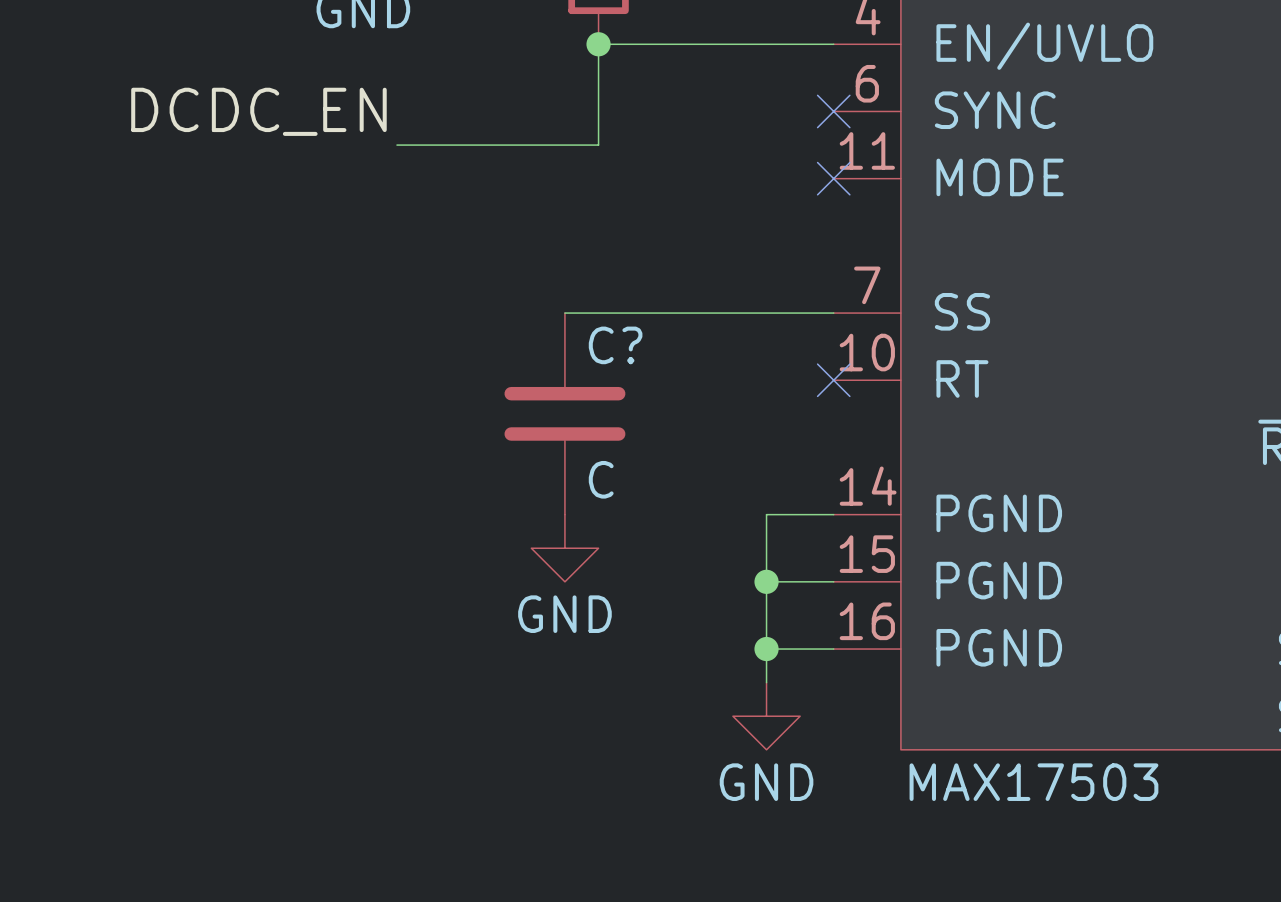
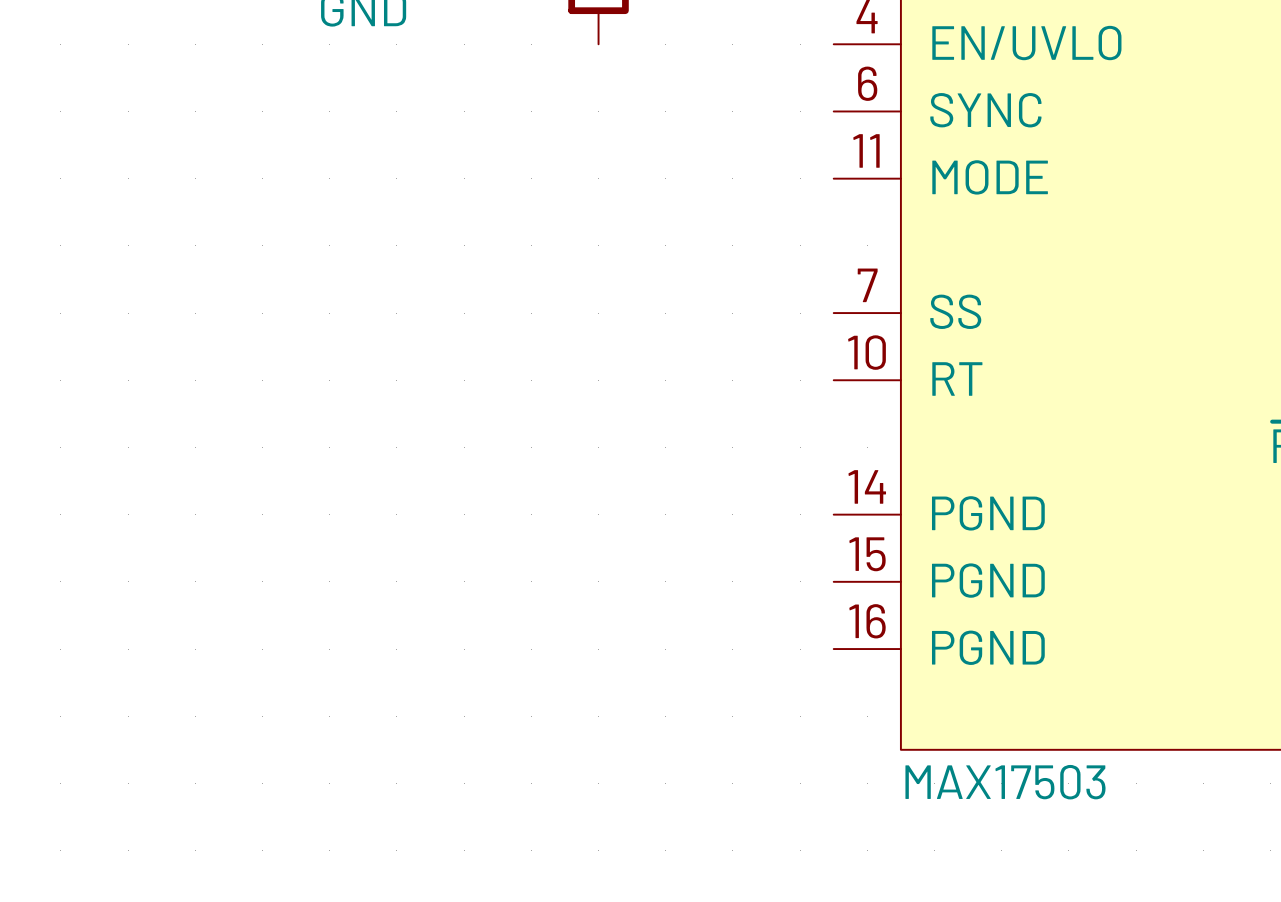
junction: (598, 44) -> none
wire: (833, 44) (598, 44) (598, 145) (396, 145) -> none
label: DCDC_EN (258, 111) -> none
no-connect mark: (833, 111) -> none
no-connect mark: (833, 178) -> none
wire: (564, 313) (833, 313) -> none
no-connect mark: (833, 380) -> none
C?: C (564, 413) -> none
wire: (833, 514) (766, 514) (766, 682) -> none
power symbol: GND (564, 548) -> none
wire: (766, 581) (833, 581) -> none
junction: (766, 581) -> none
wire: (766, 649) (833, 649) -> none
junction: (766, 649) -> none
power symbol: GND (766, 716) -> none

